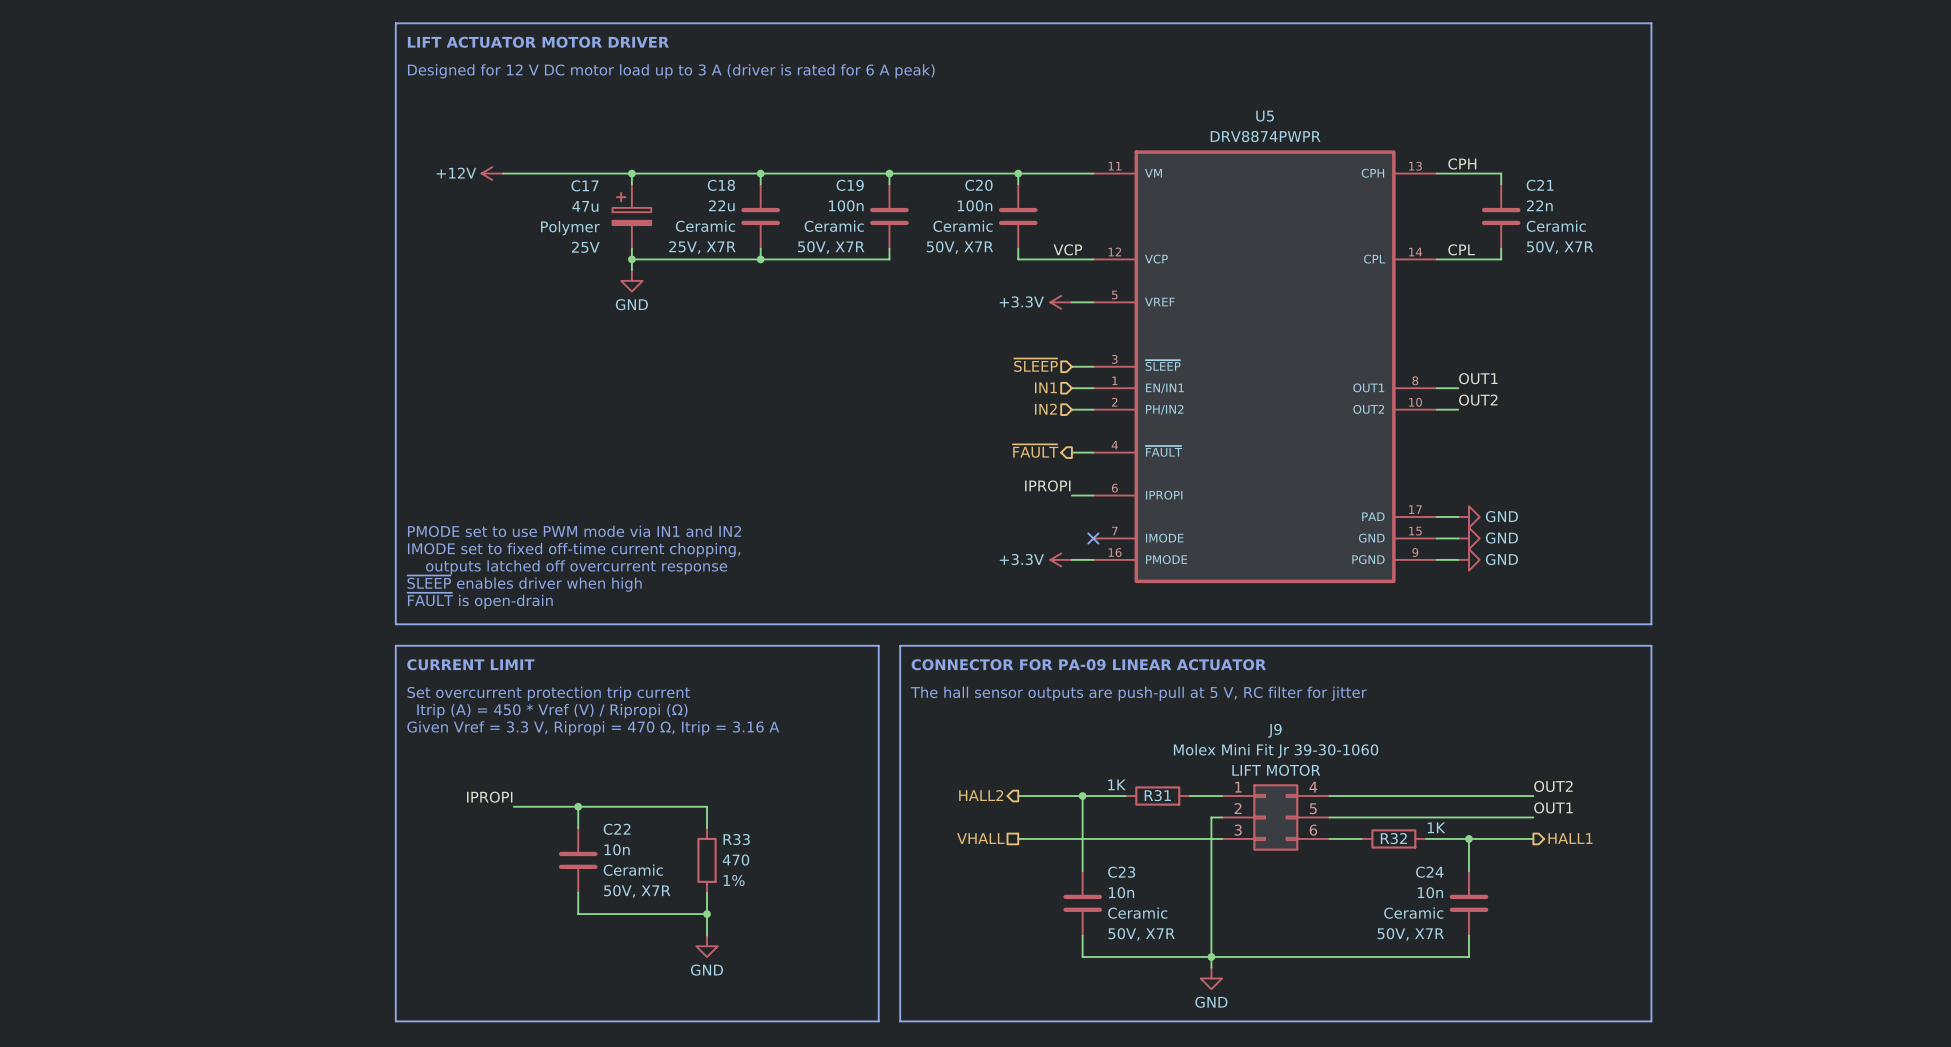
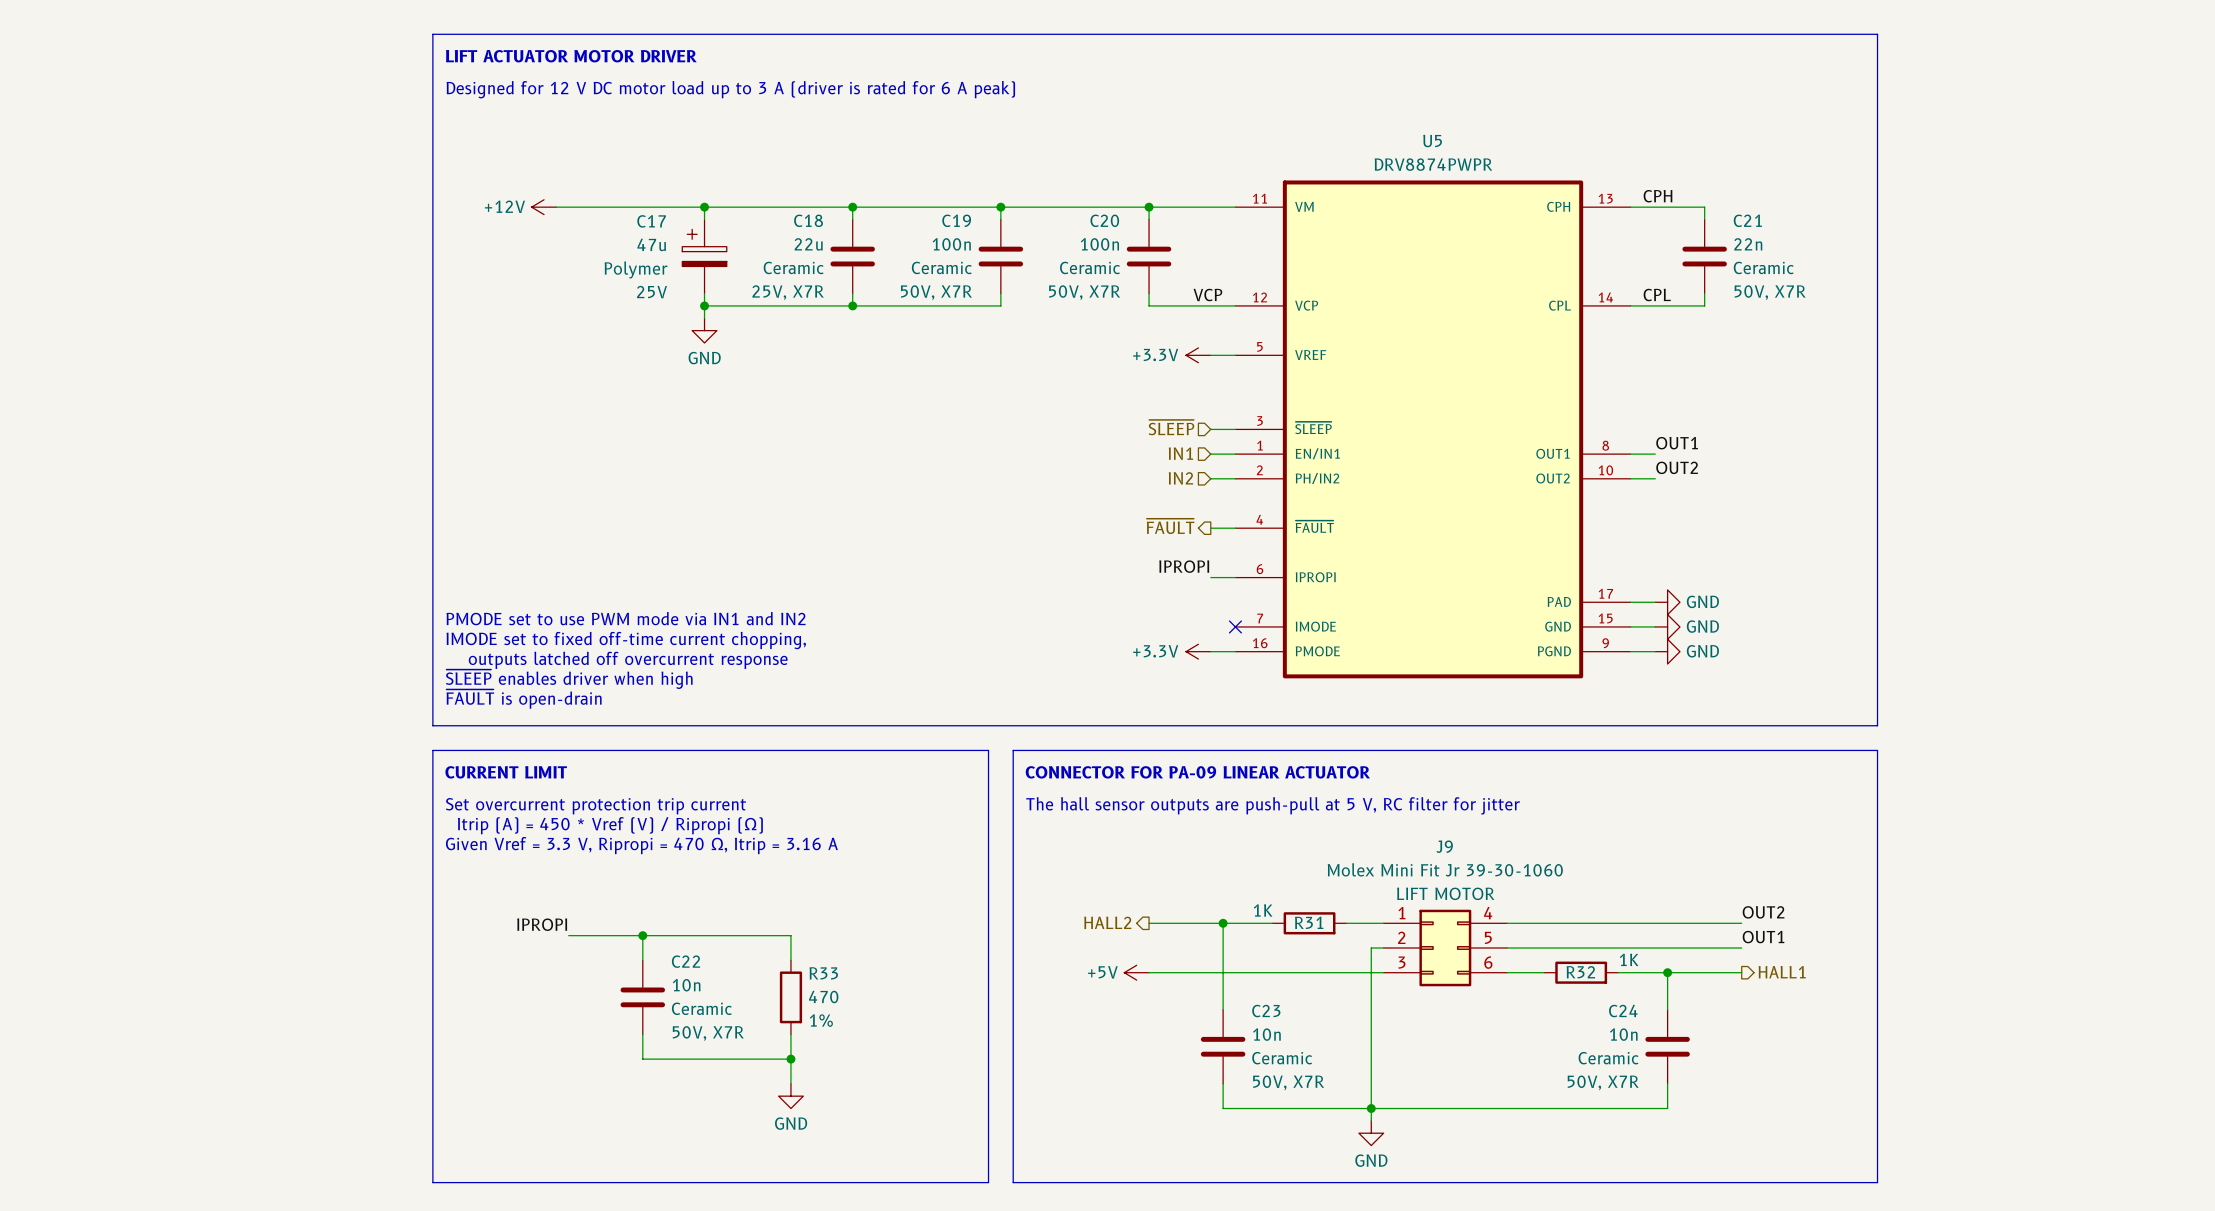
hierarchical label: VHALL (980, 838) -> none
power symbol: none -> +5V (1136, 972)

